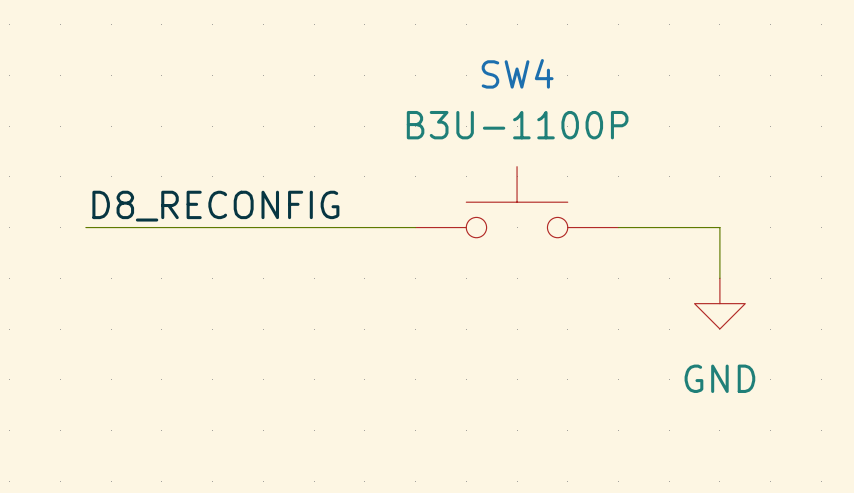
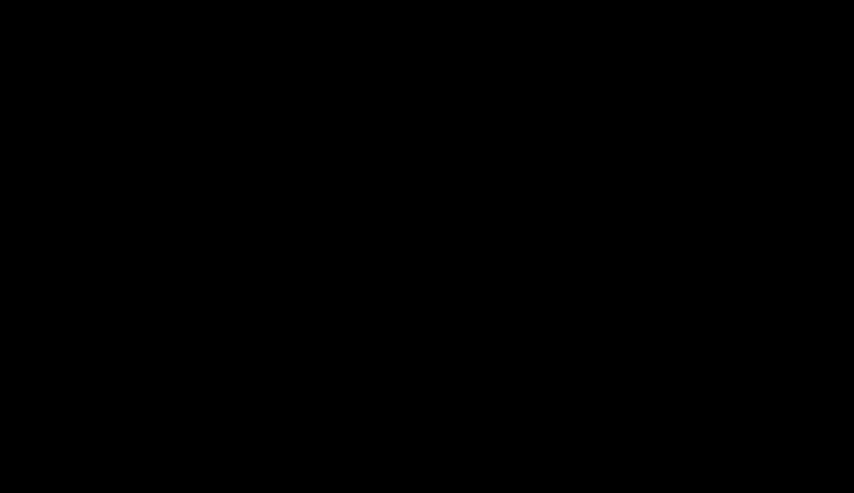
SW4: B3U-1100P (517, 202) -> none
label: D8_RECONFIG (215, 206) -> none
wire: (85, 227) (415, 227) -> none
wire: (618, 227) (719, 227) (719, 278) -> none
power symbol: GND (719, 303) -> none

